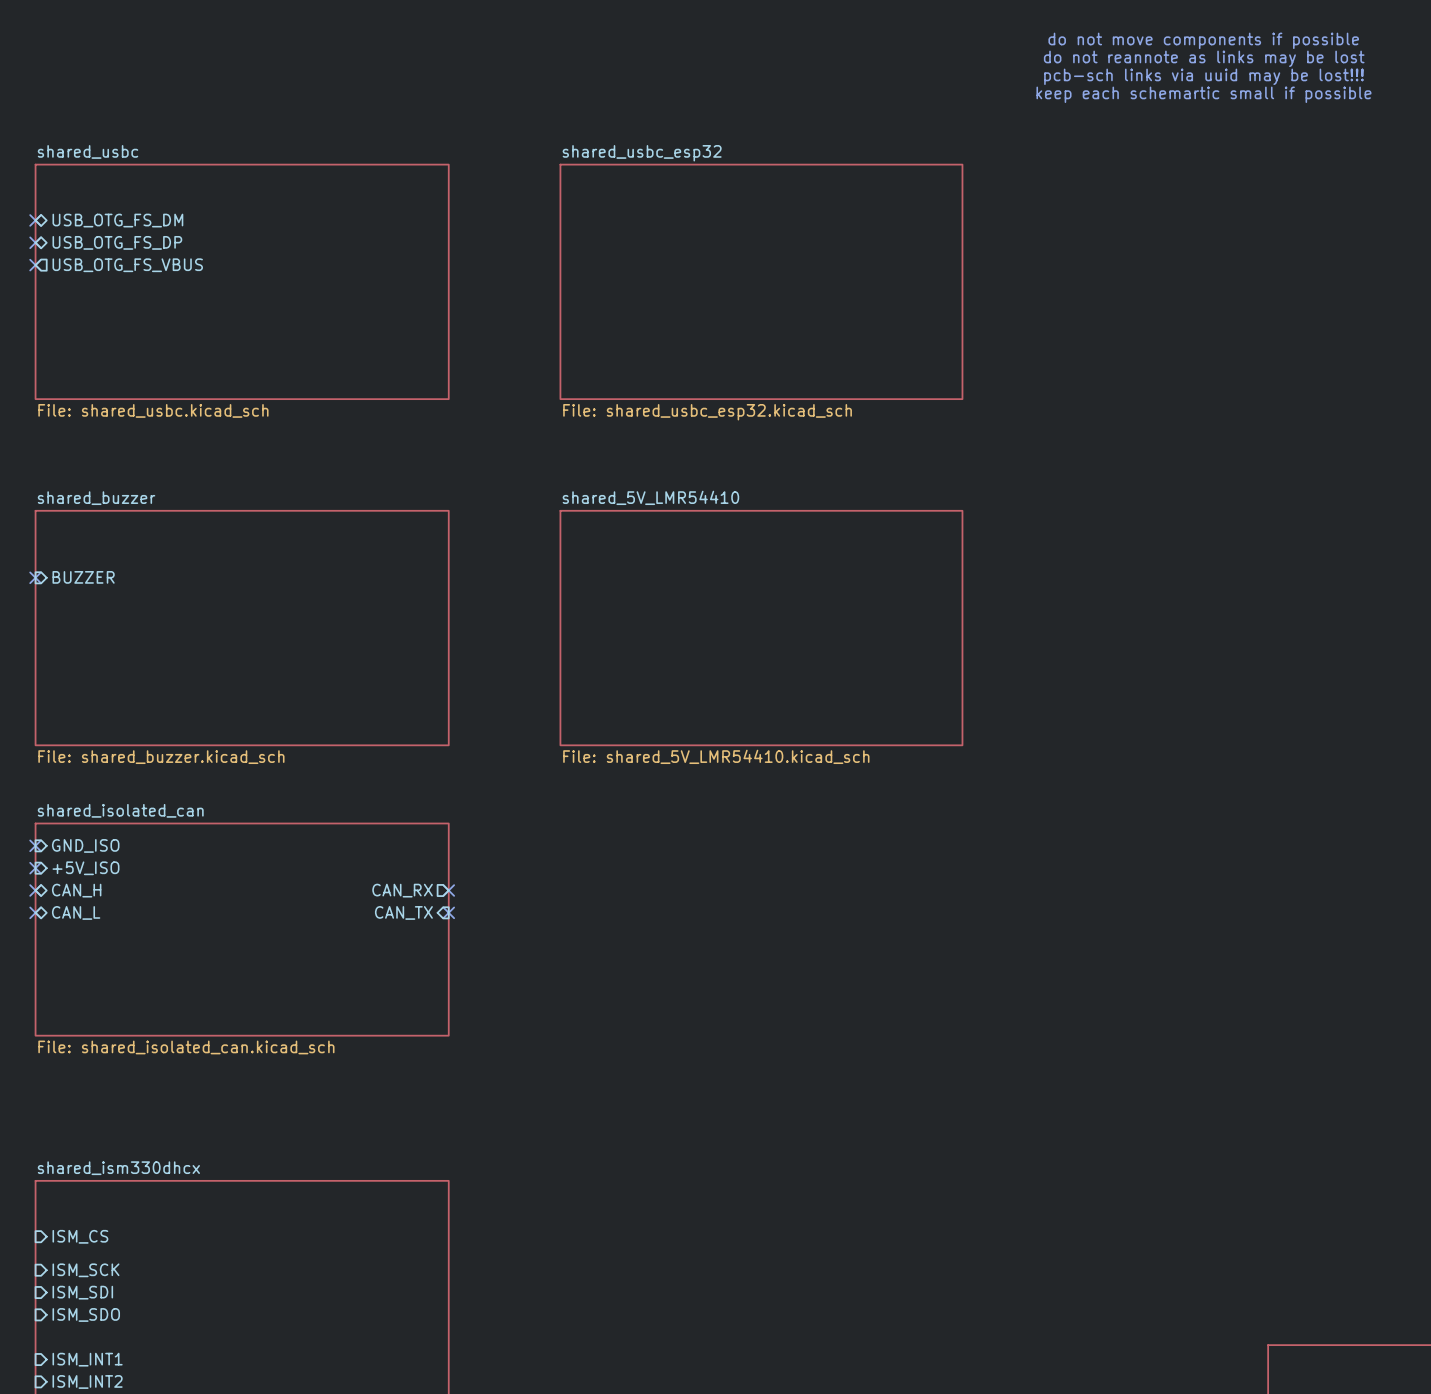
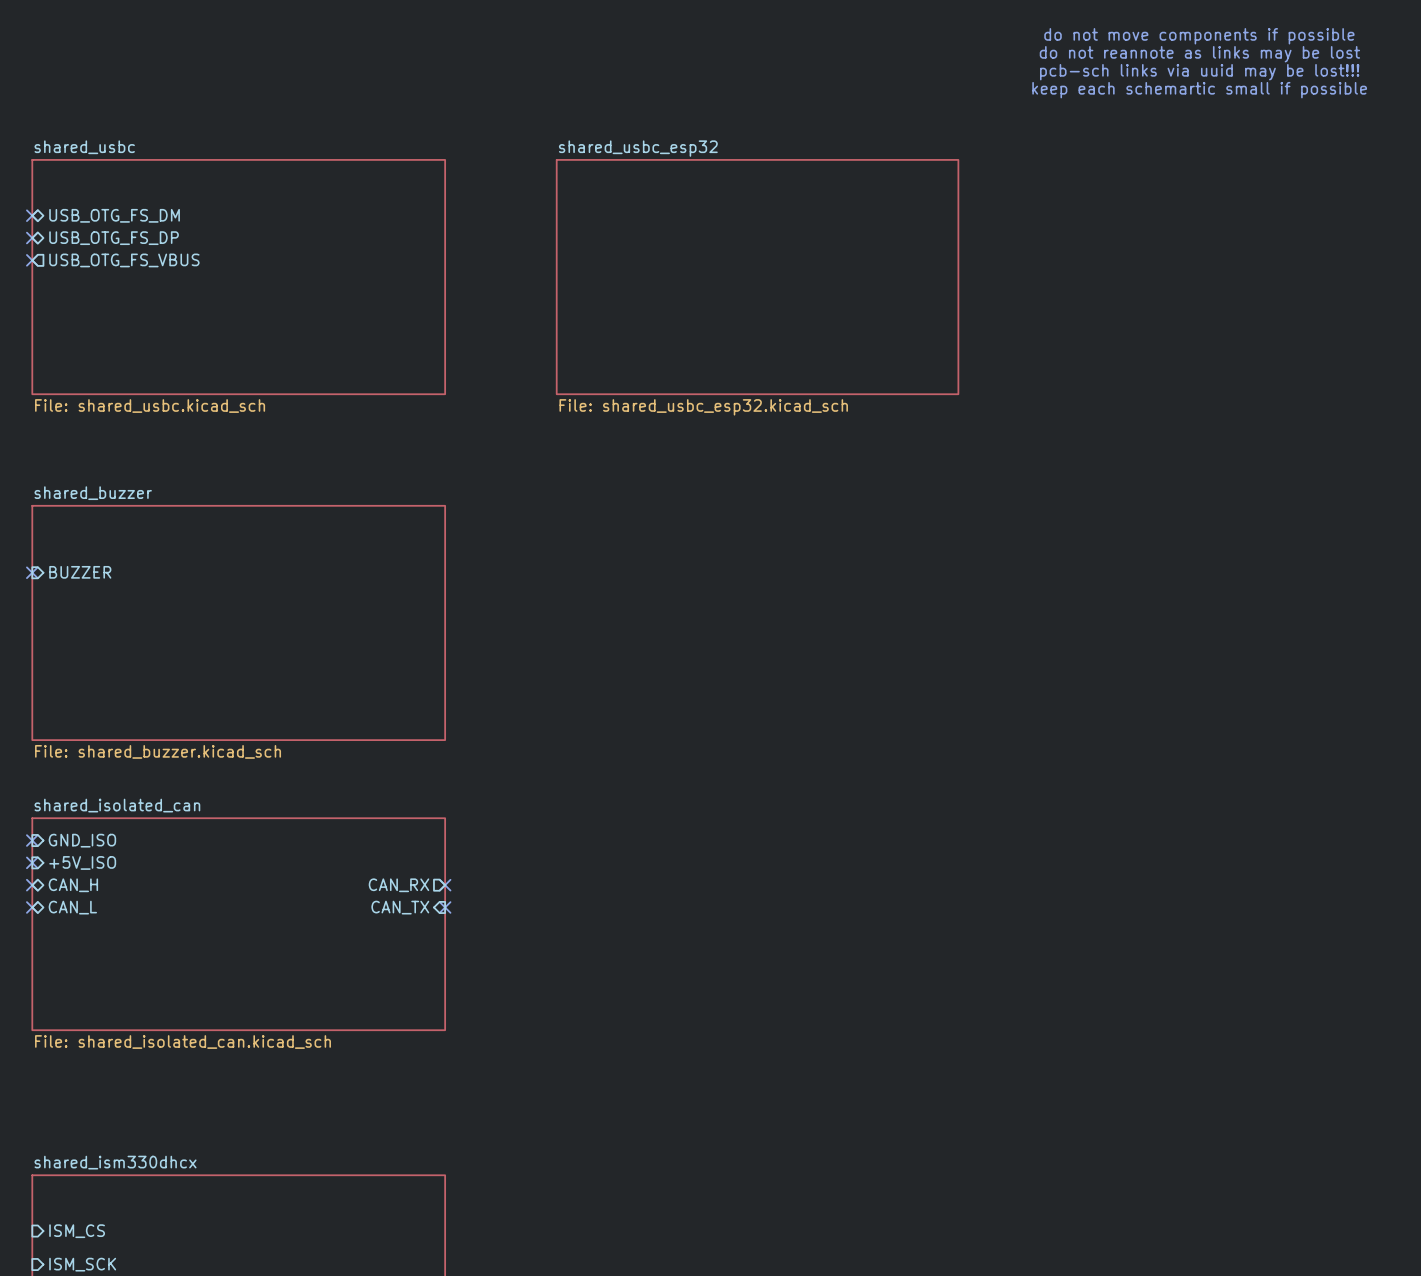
sheet shared_5V_LMR54410: File: shared_5V_LMR54410.kicad_sch (761, 628) -> none

